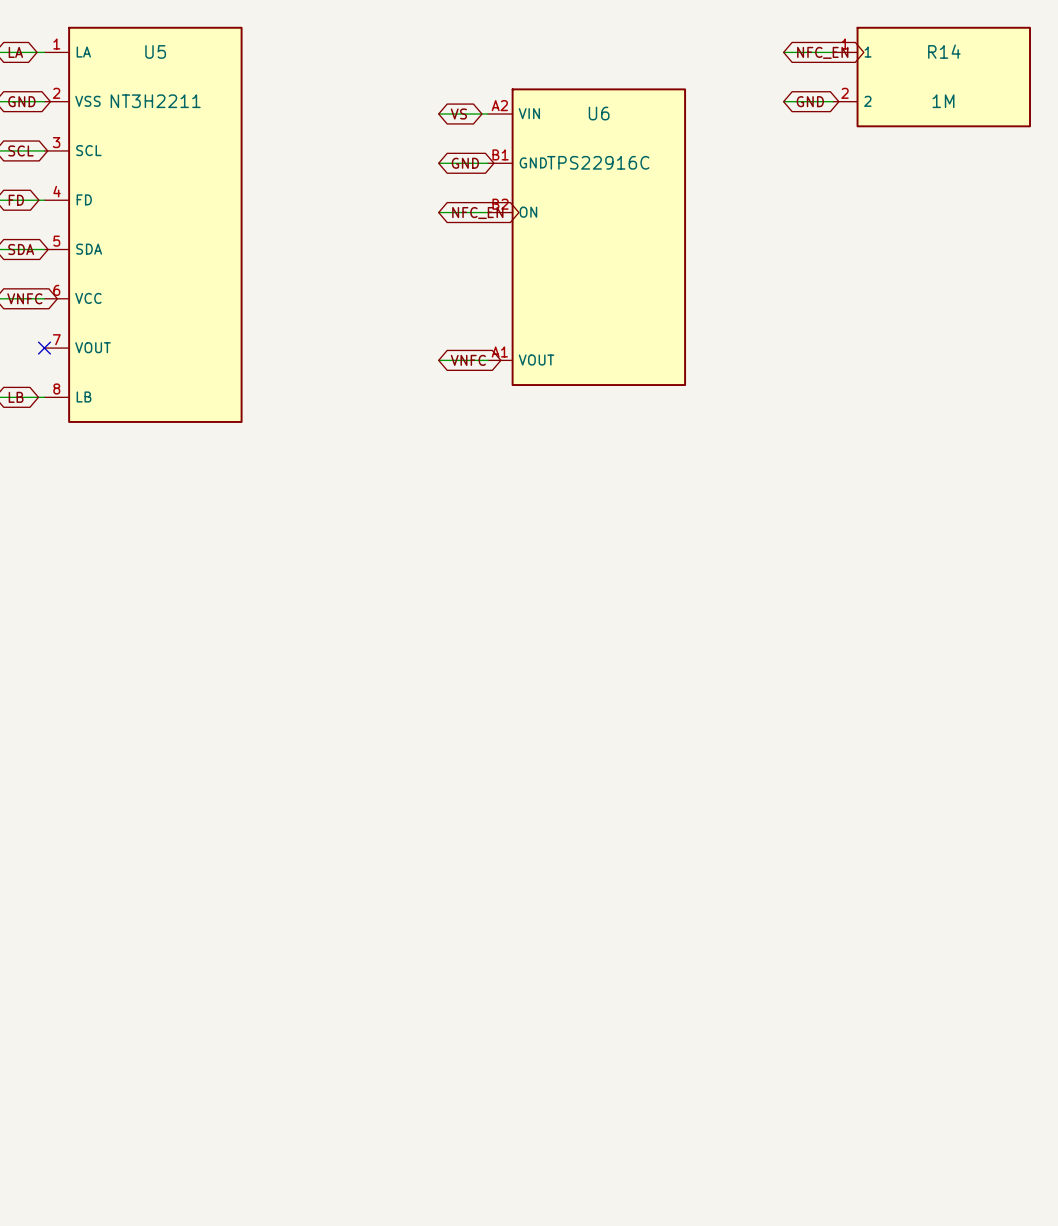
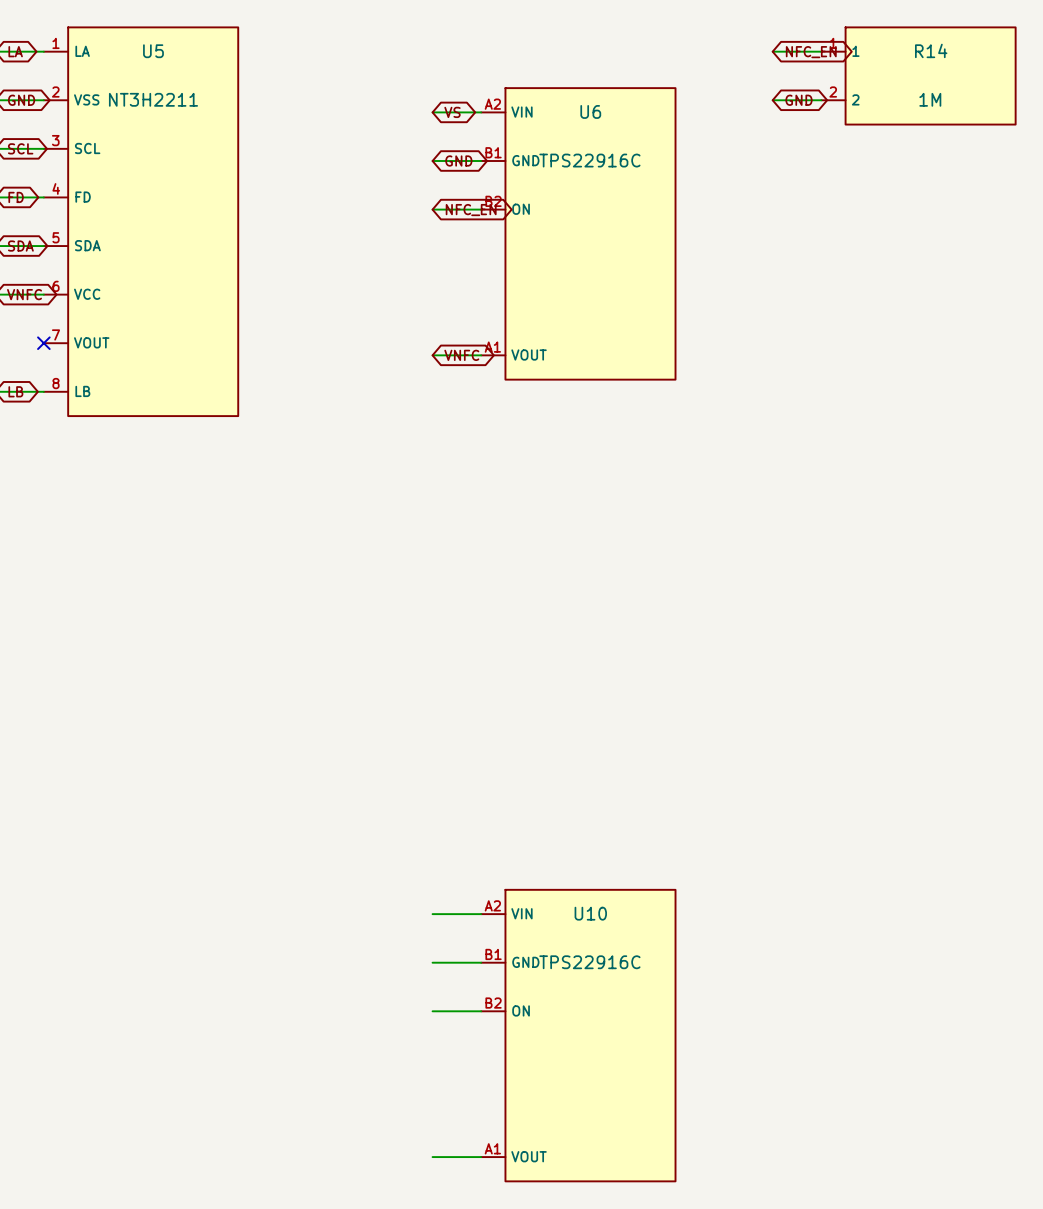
wire: none -> (432, 914) (481, 914)
wire: none -> (432, 962) (481, 962)
wire: none -> (432, 1011) (481, 1011)
U10: none -> TPS22916C (578, 1035)
wire: none -> (432, 1157) (481, 1157)

